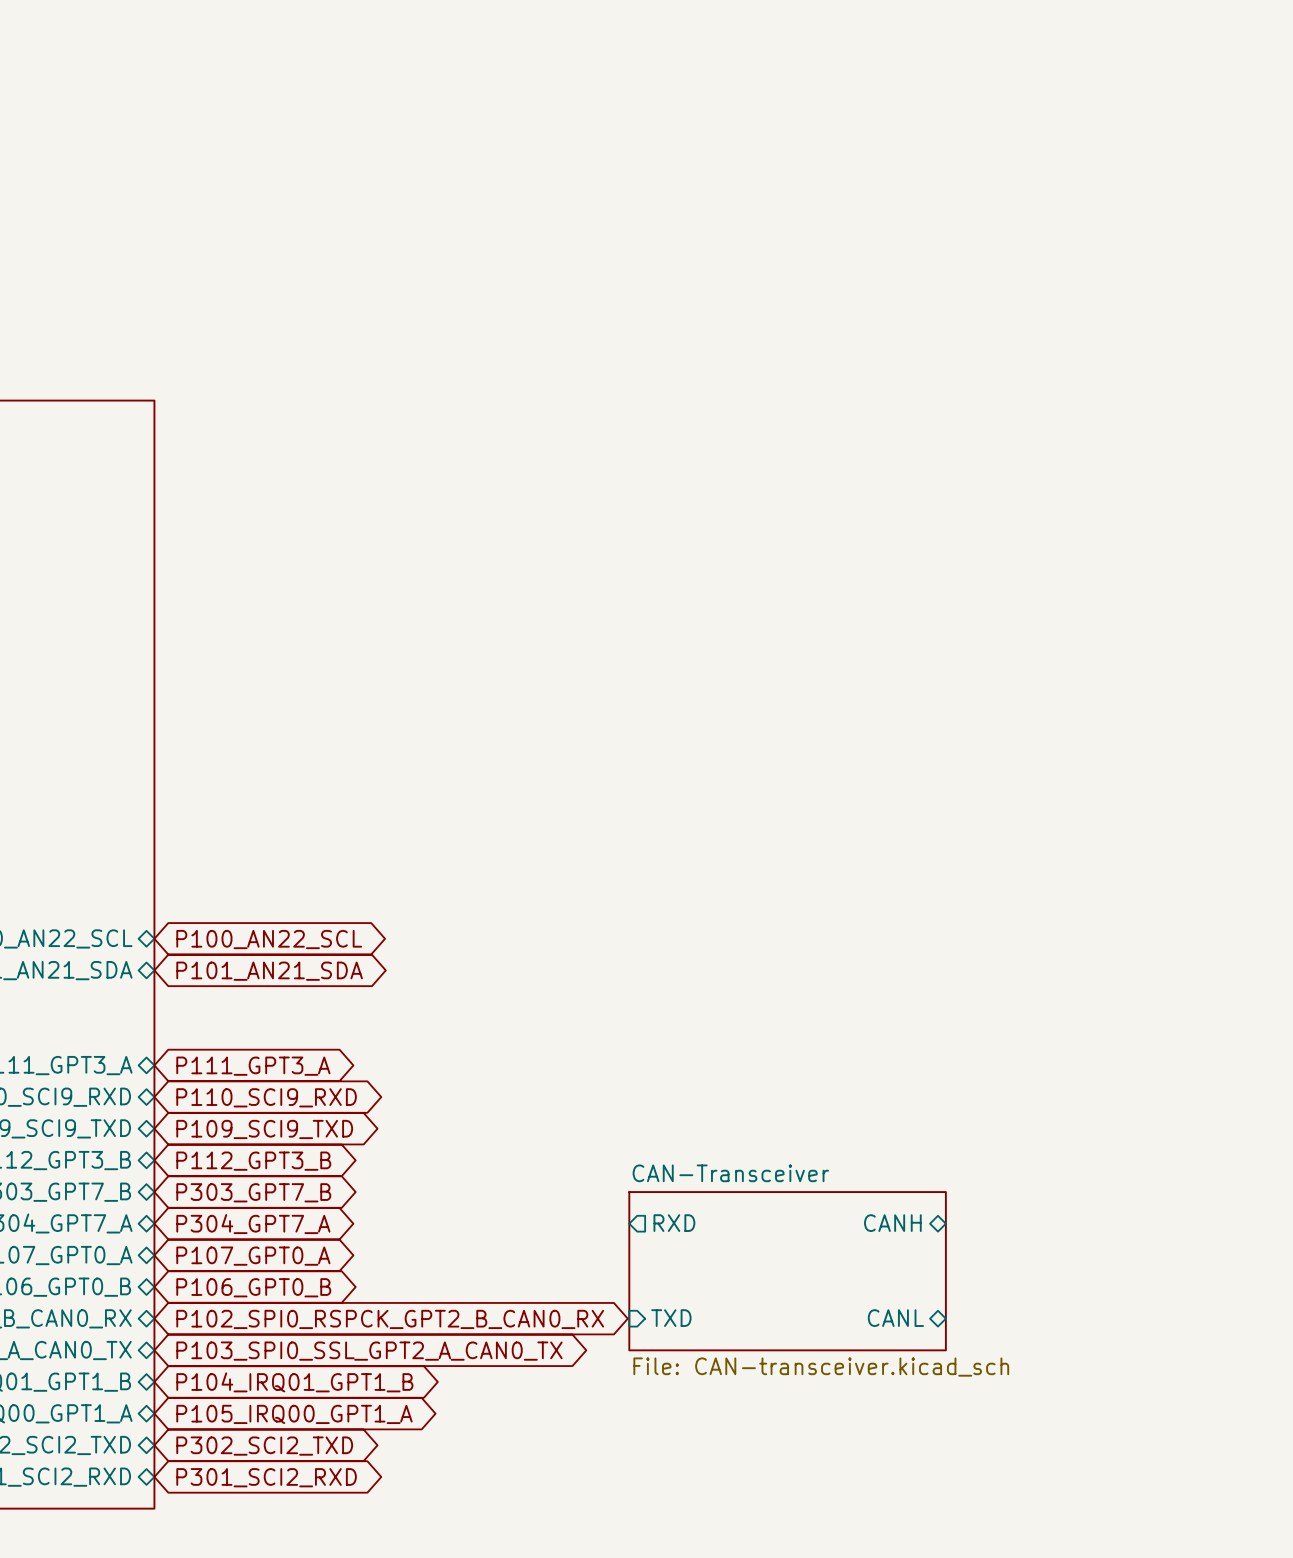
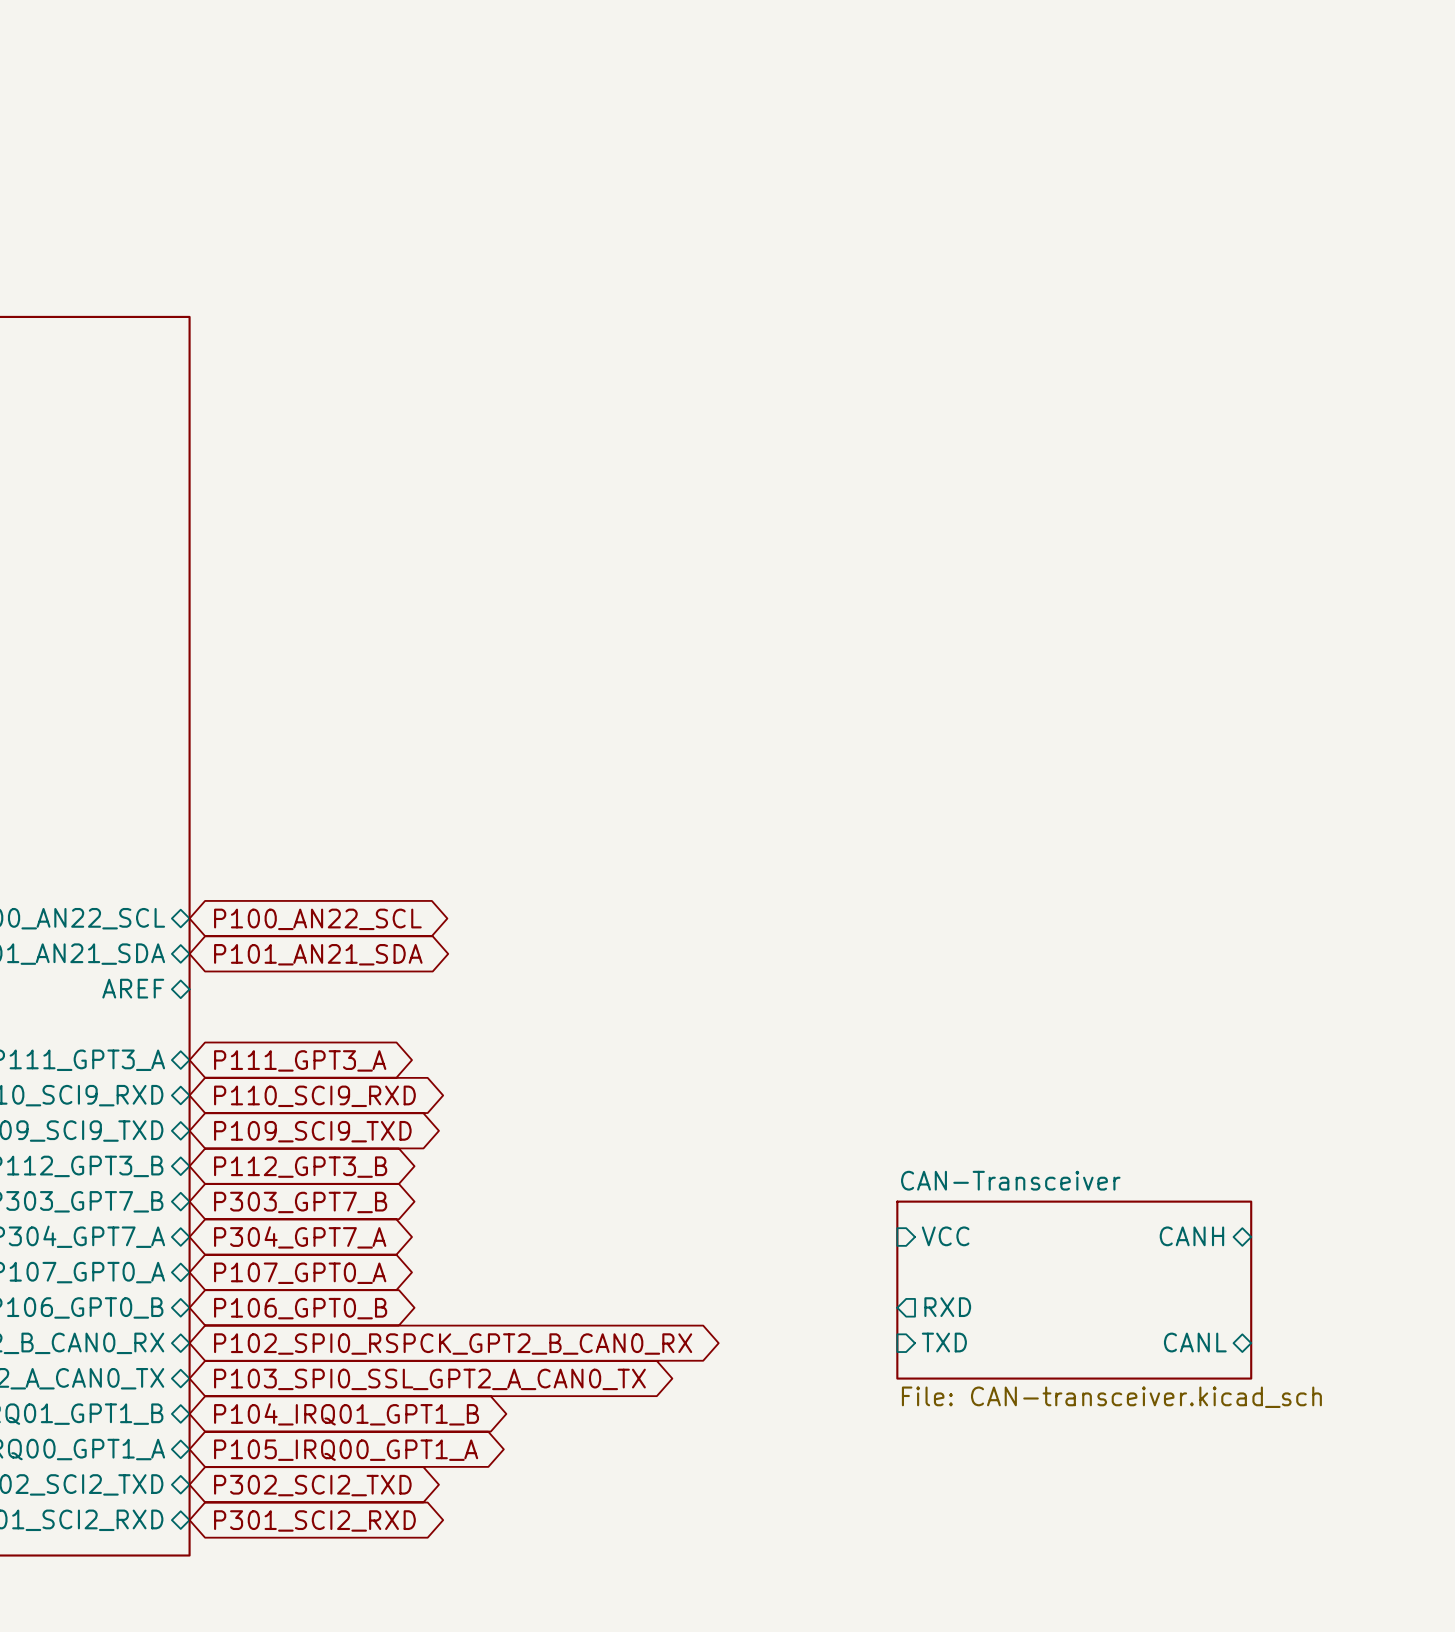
sheet pin: none -> AREF (133, 988)
sheet pin position: RXD (674, 1223) -> RXD (947, 1307)
sheet pin: none -> VCC (945, 1236)
sheet pin position: CANH (892, 1223) -> CANH (1191, 1236)
sheet CAN-Transceiver position: (787, 1271) -> (1074, 1290)
sheet pin position: TXD (671, 1318) -> TXD (944, 1342)
sheet pin position: CANL (895, 1318) -> CANL (1195, 1342)

